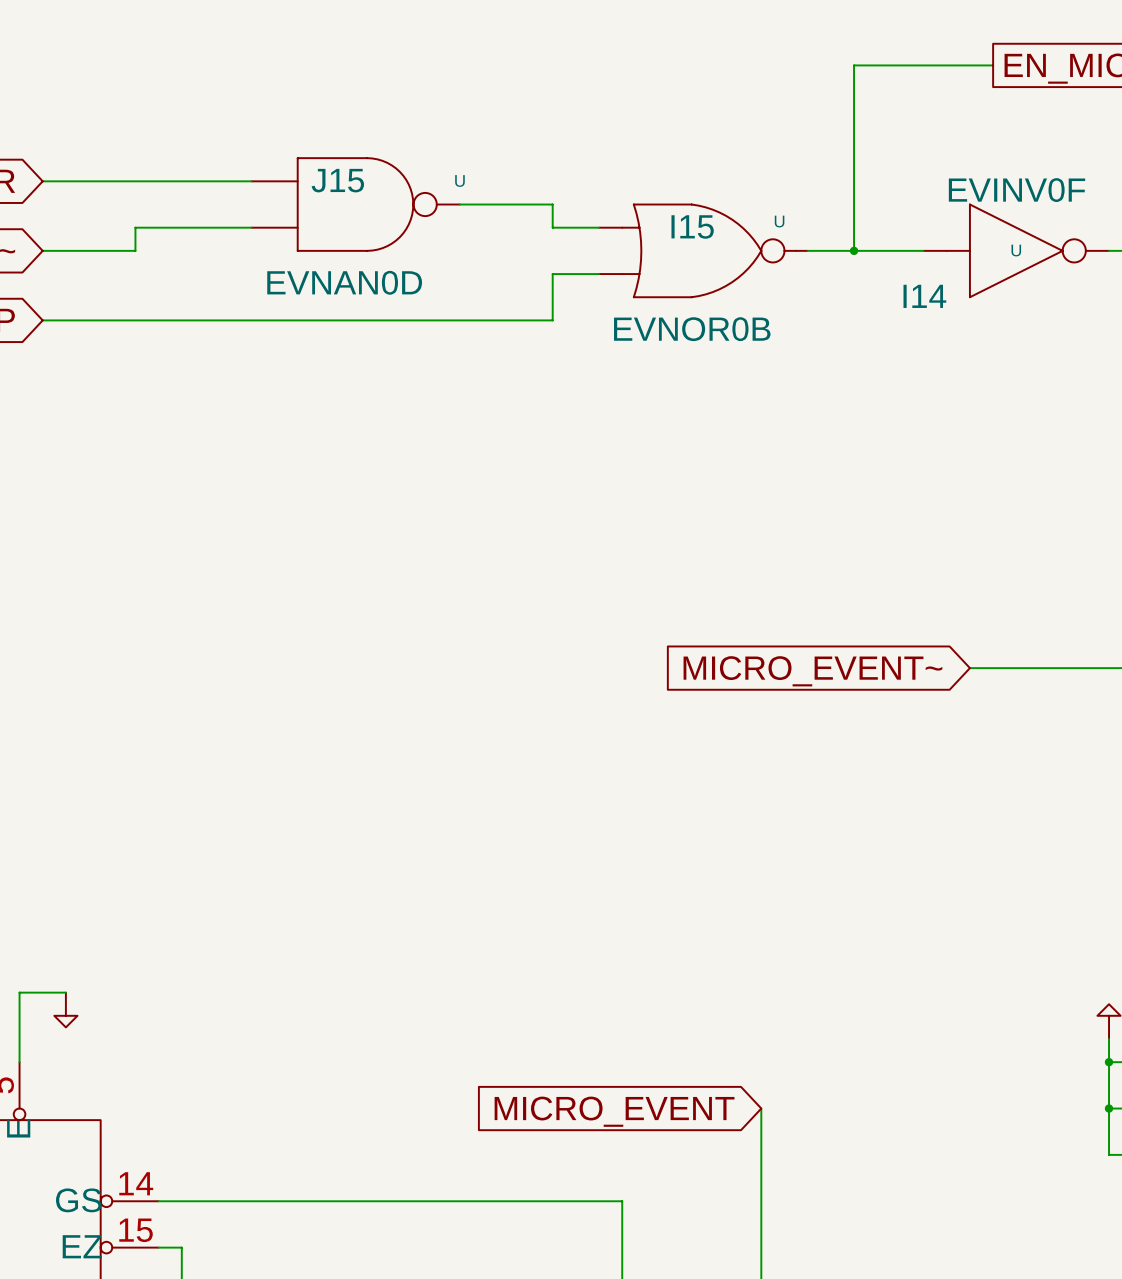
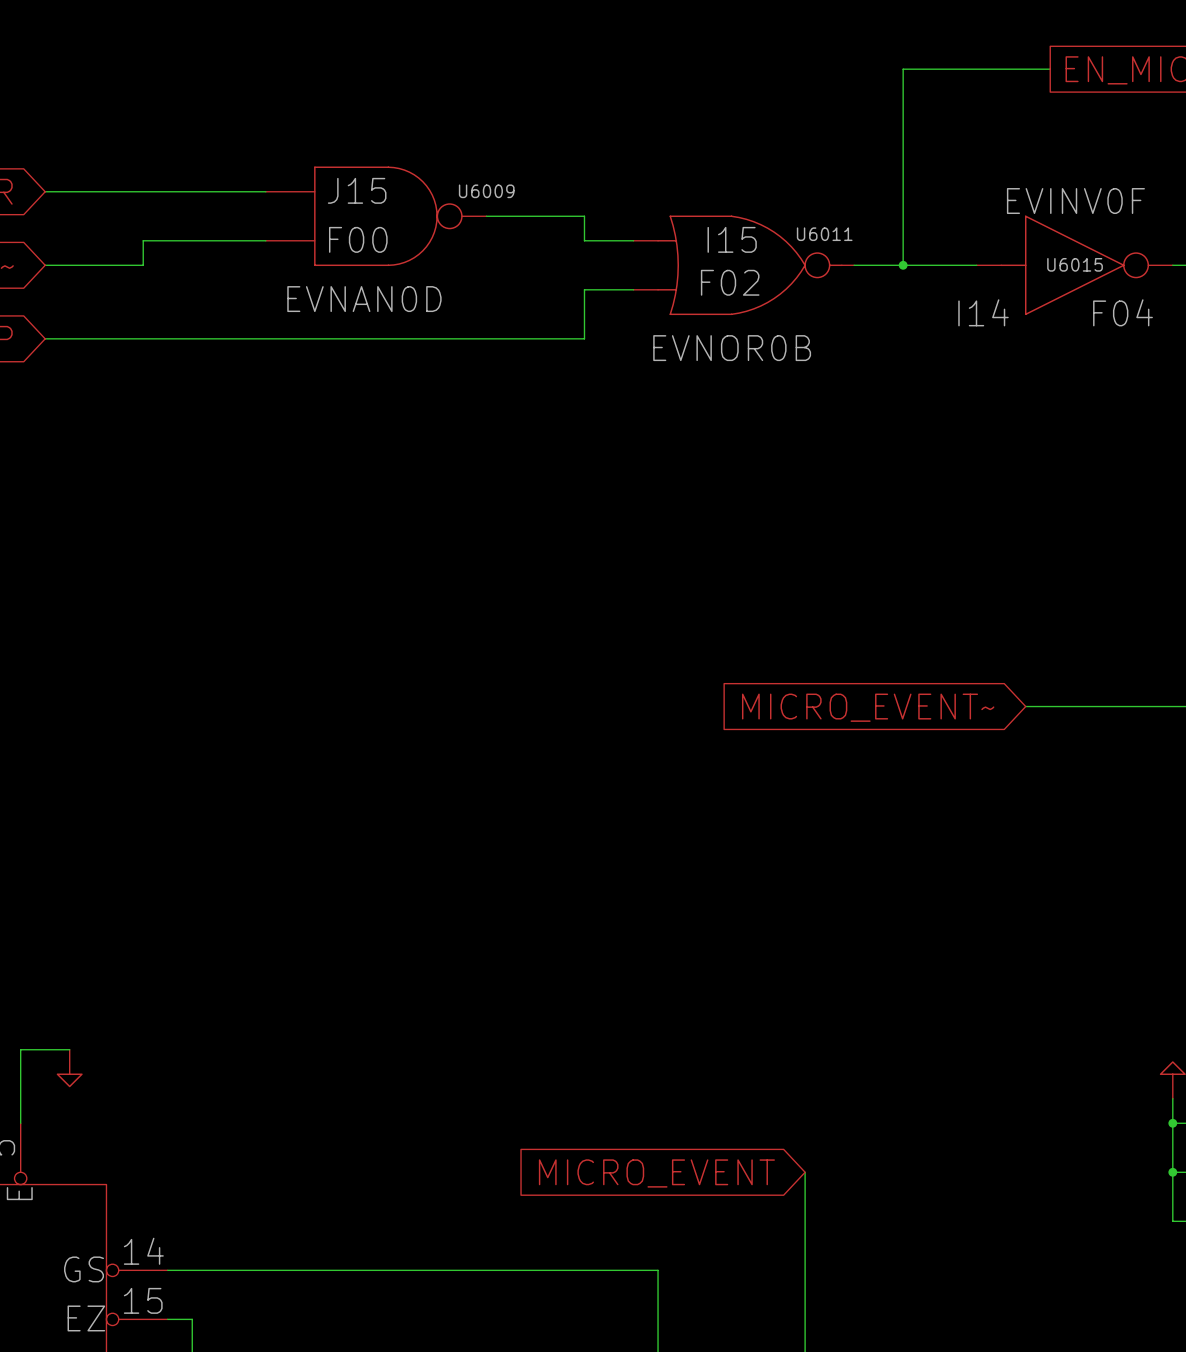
U name: U (459, 180) -> U6009 (486, 191)
U name: U (779, 221) -> U6011 (824, 234)
U value: none -> F00 (358, 239)
U name: U (1016, 250) -> U6015 (1075, 264)
U value: none -> F02 (730, 282)
U value: none -> F04 (1122, 312)

